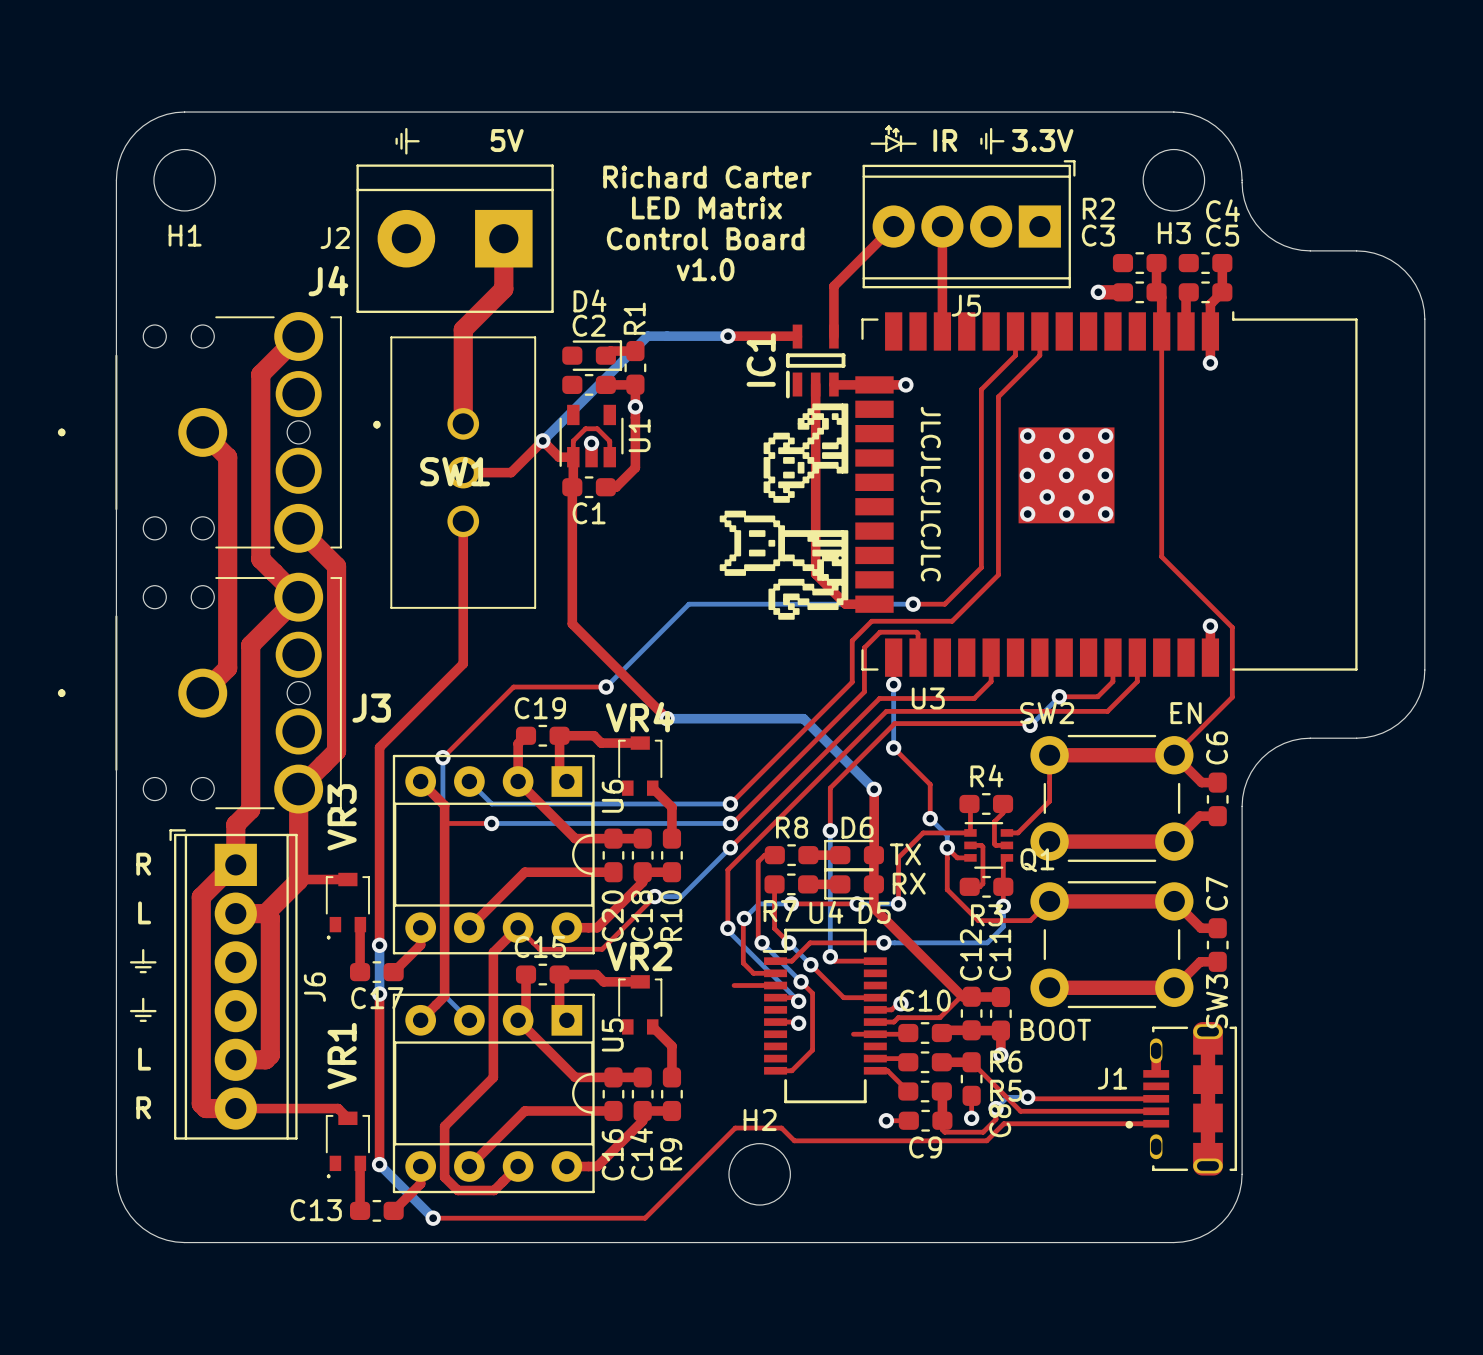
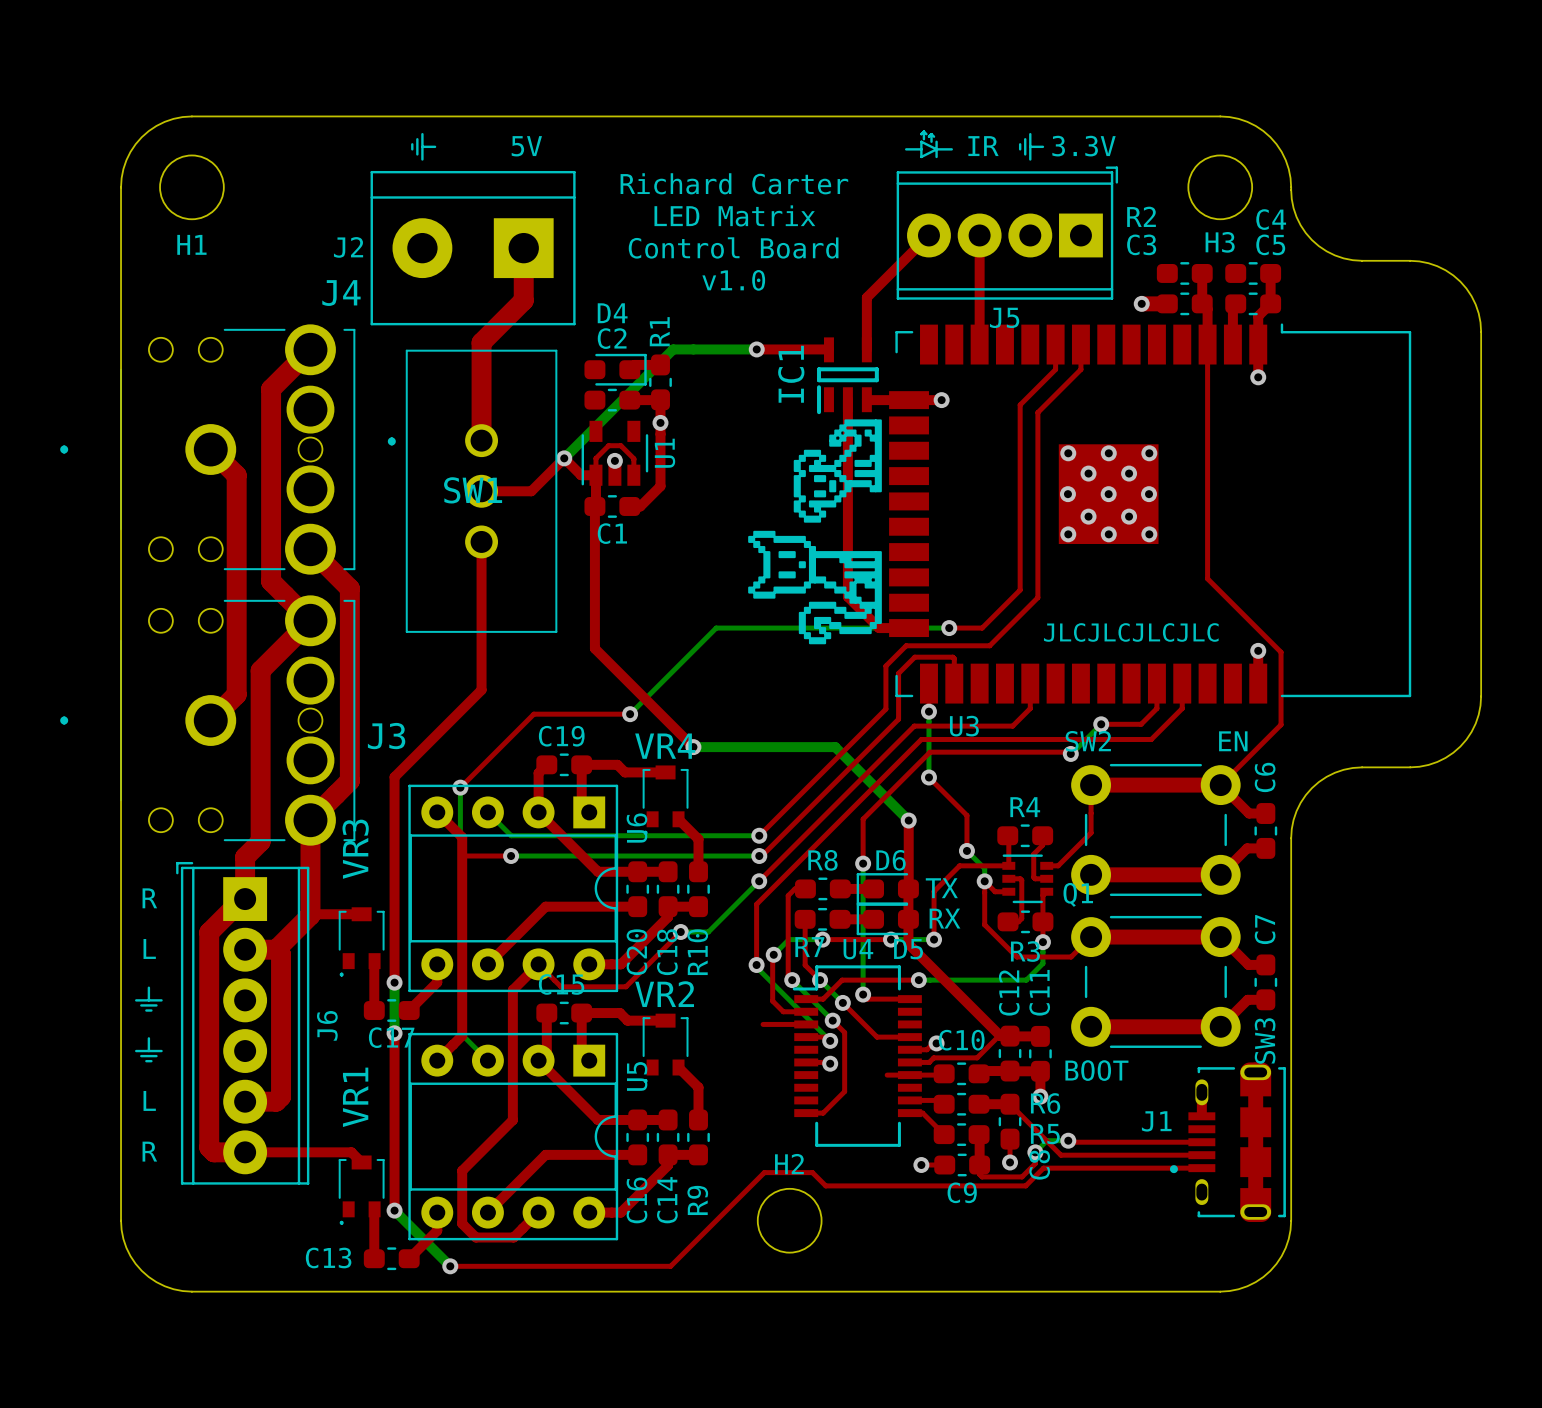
text rotation: 0° (930, 494) -> 90° counterclockwise (1131, 632)

